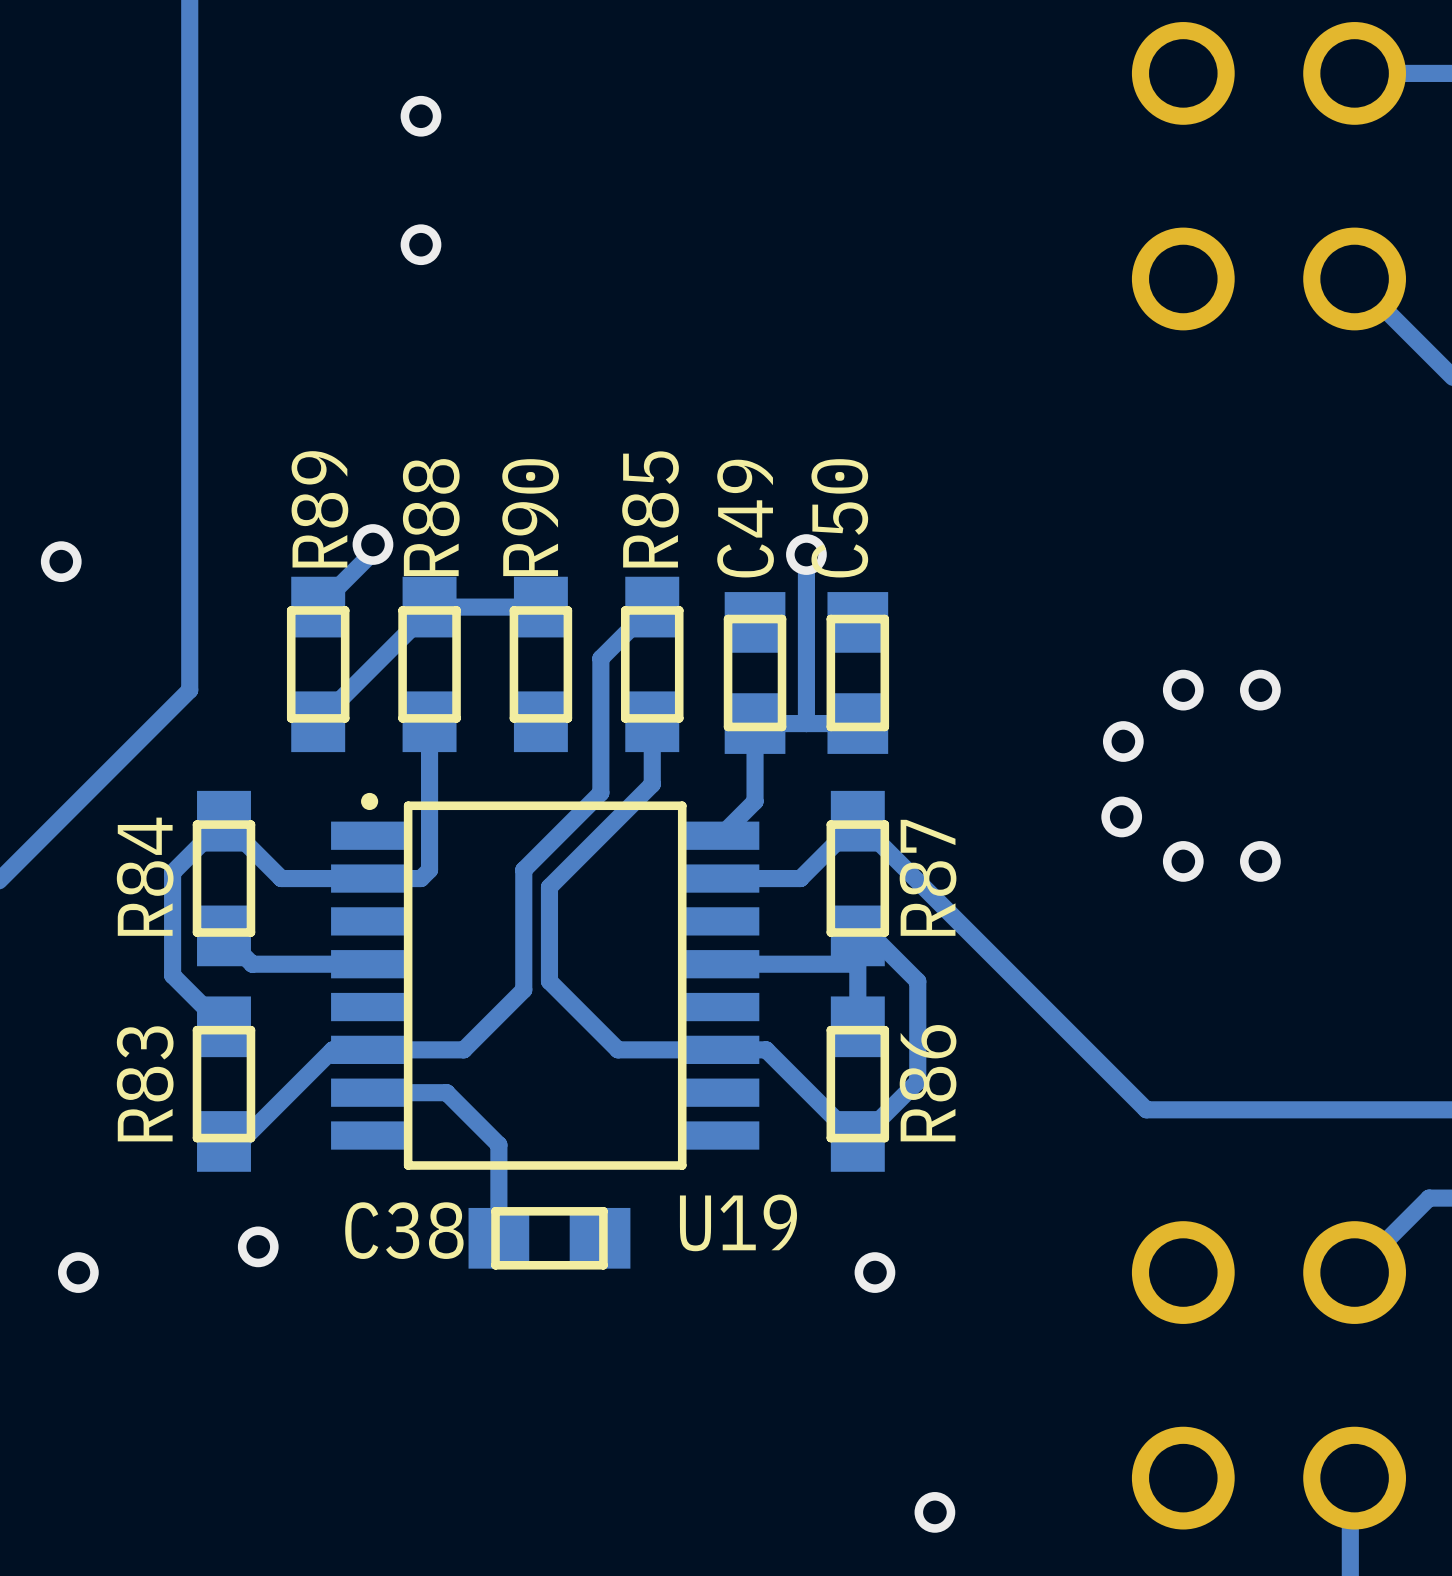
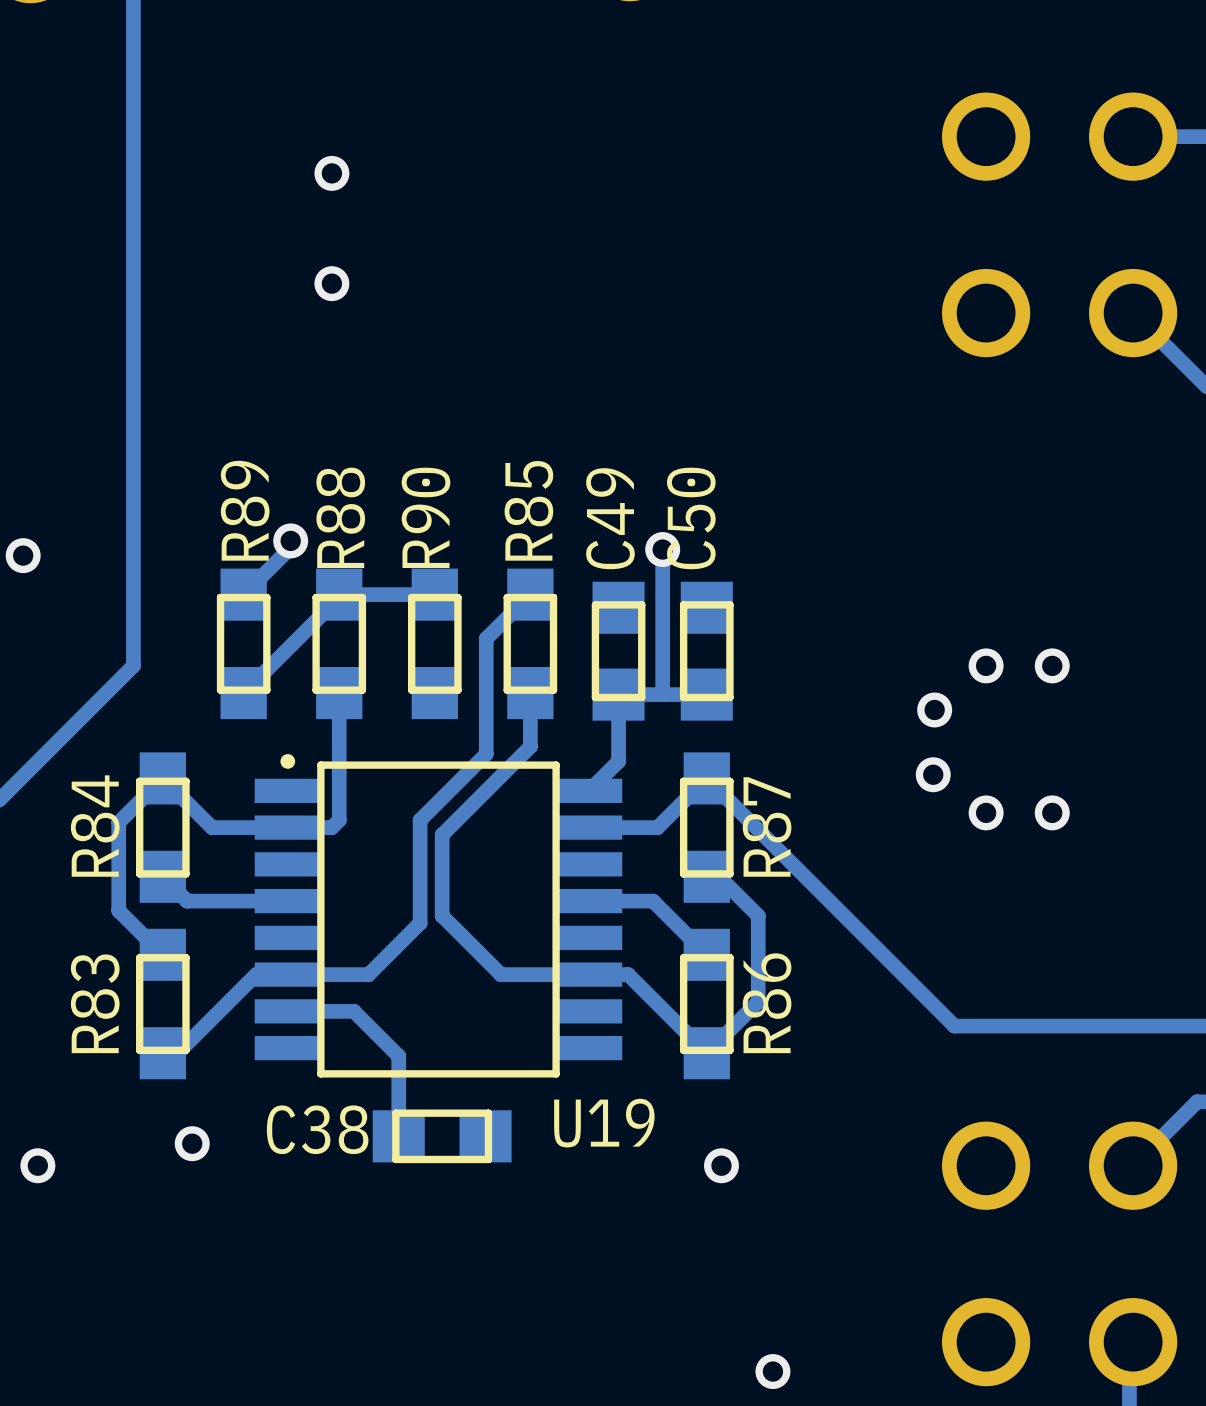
track: (795, 964) (857, 964) (857, 1026) -> (653, 901) (706, 954)

